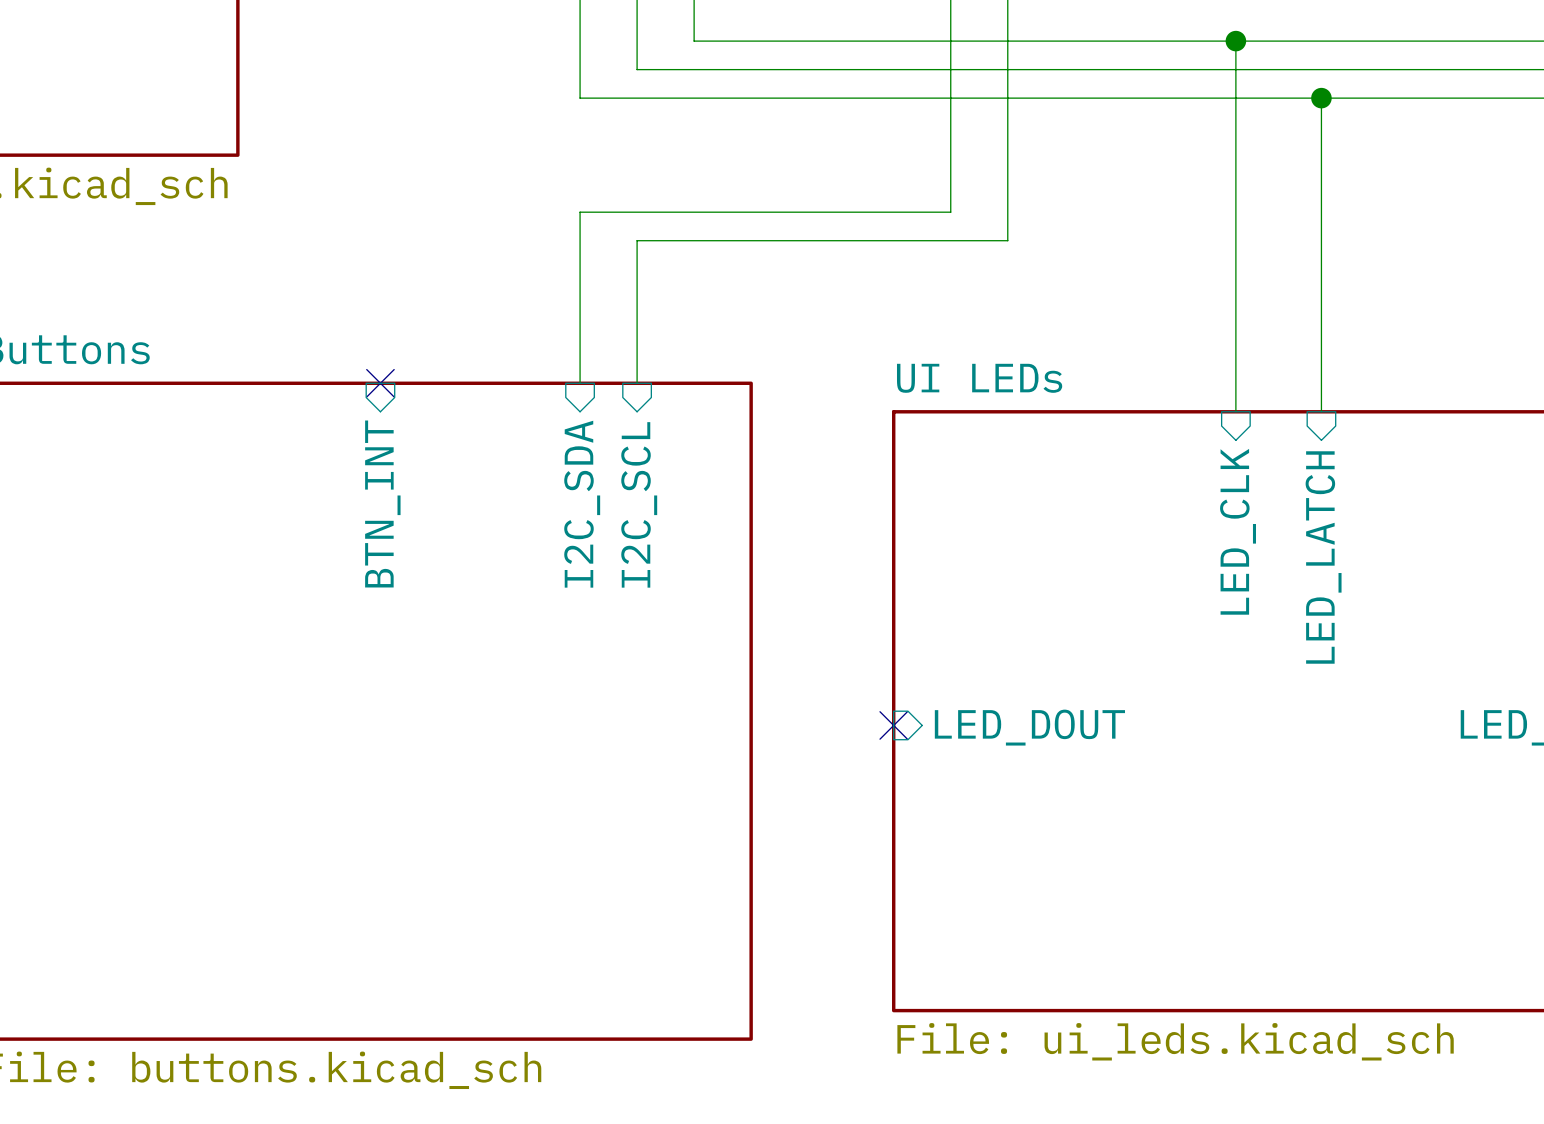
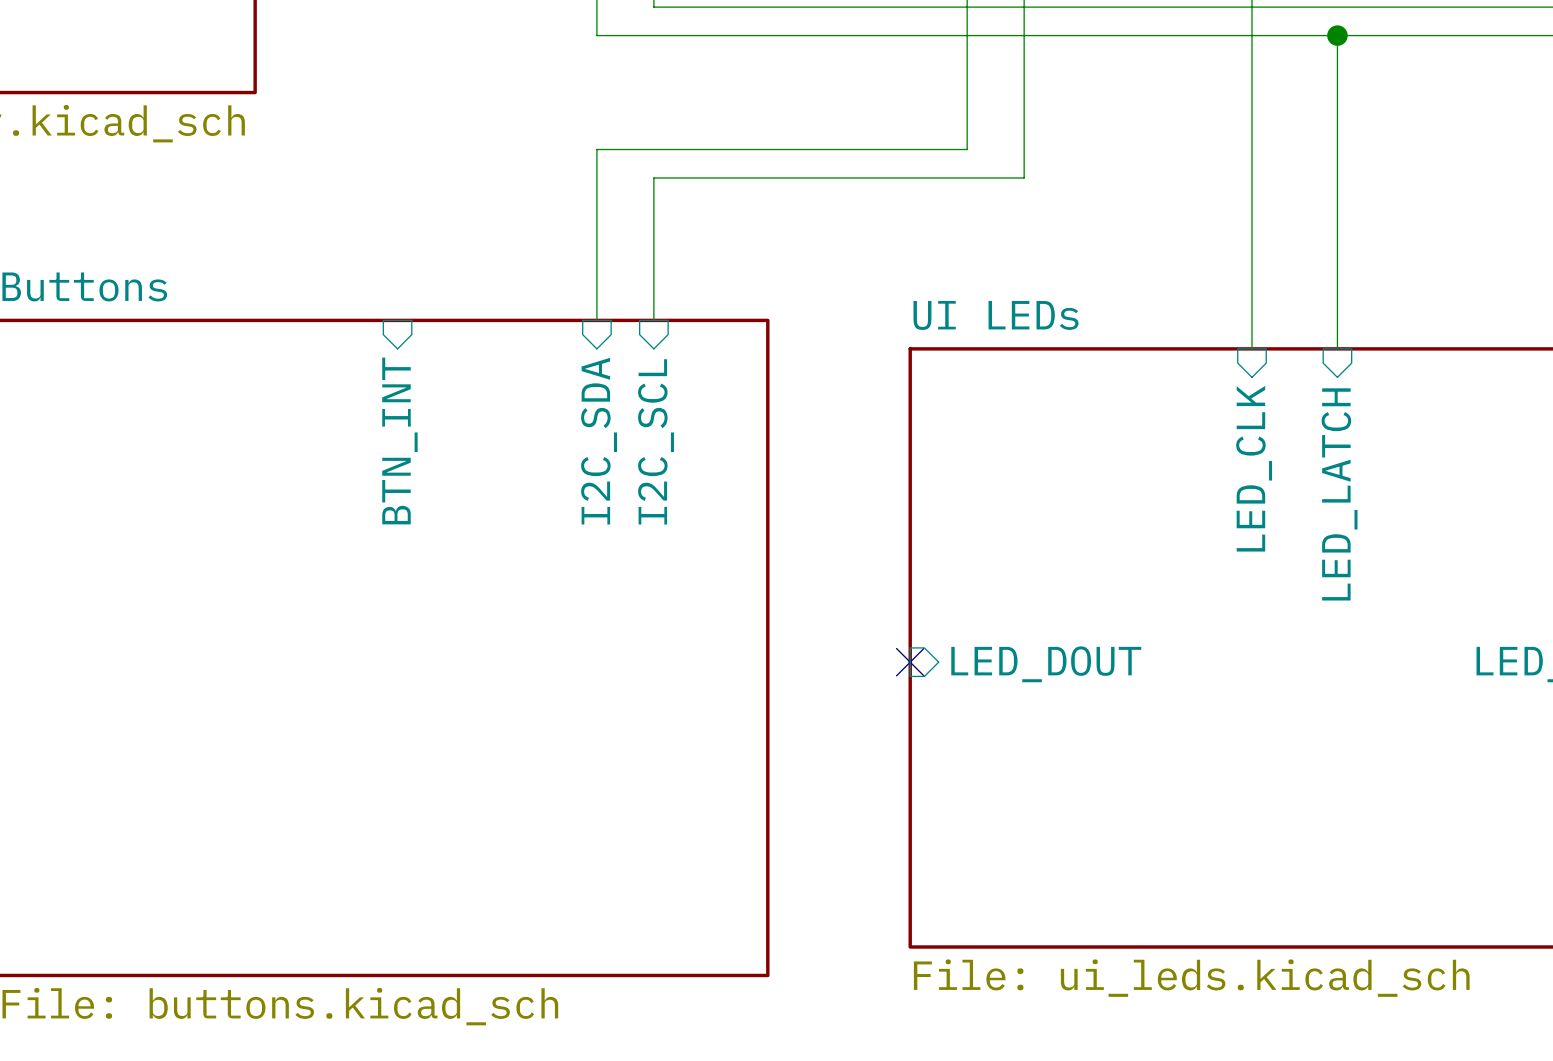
no-connect mark: (380, 383) -> none

